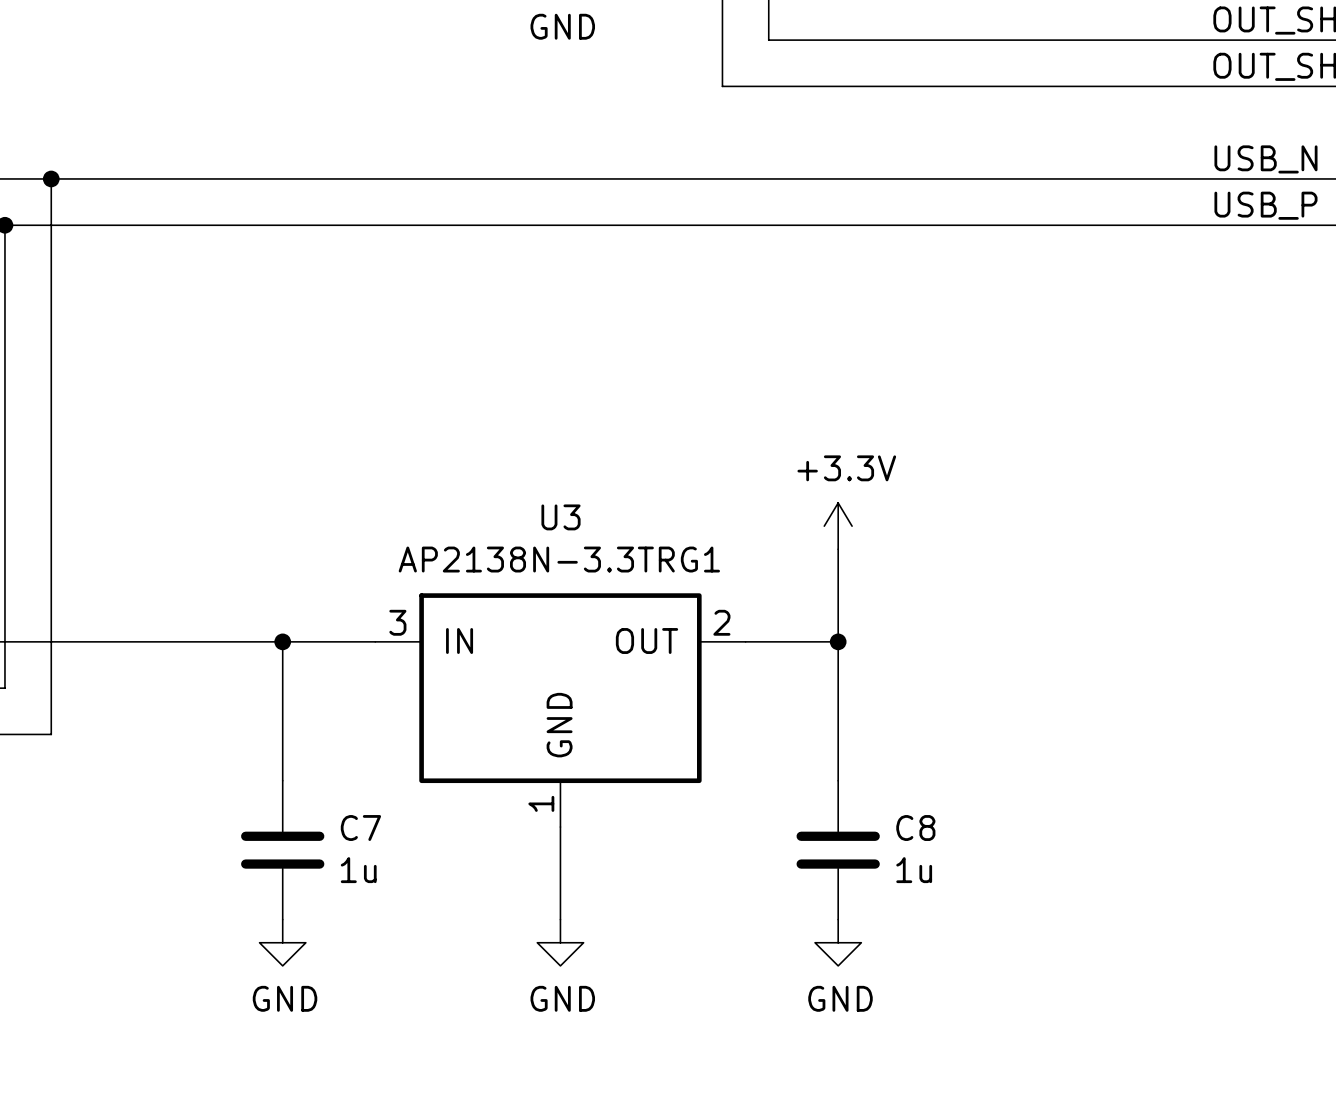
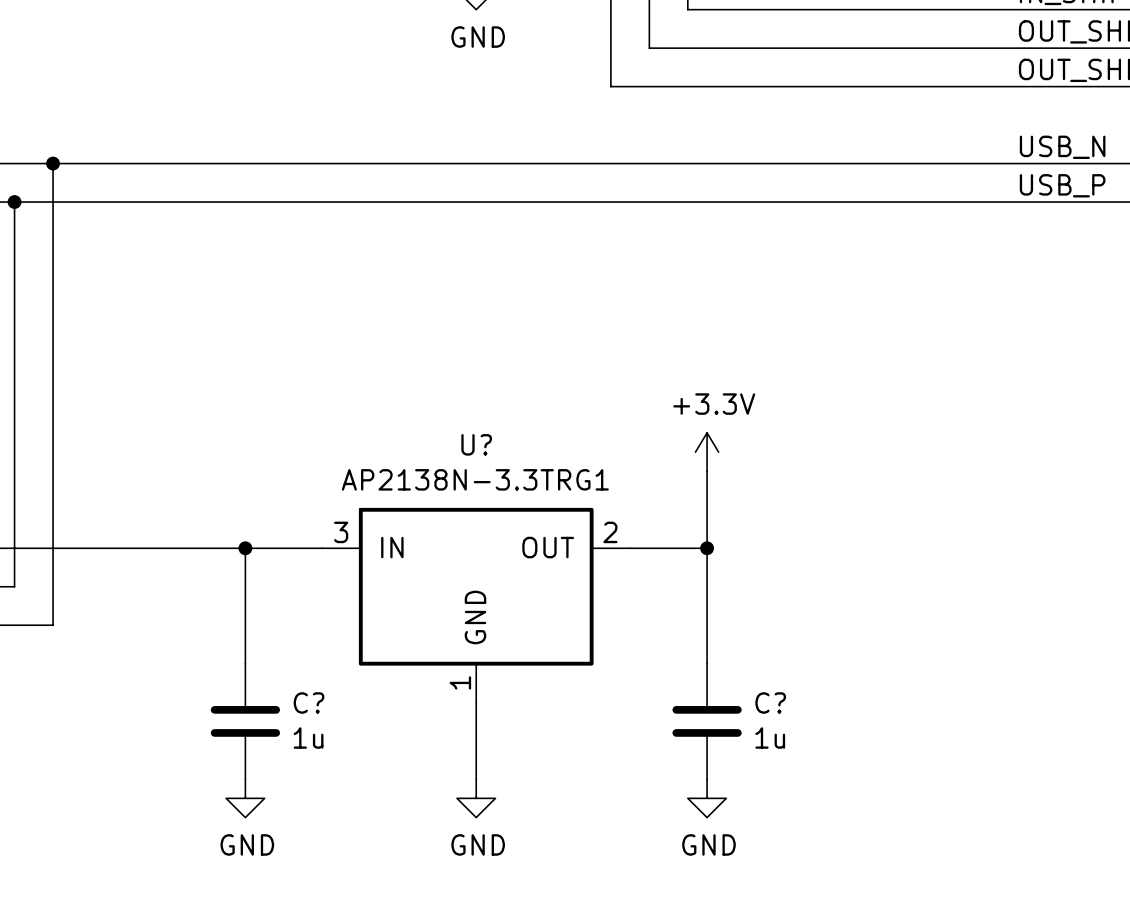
U3 name: U3 (561, 517) -> U? (476, 444)
C7 name: C7 (360, 828) -> C? (309, 702)
C8 name: C8 (915, 828) -> C? (770, 702)

